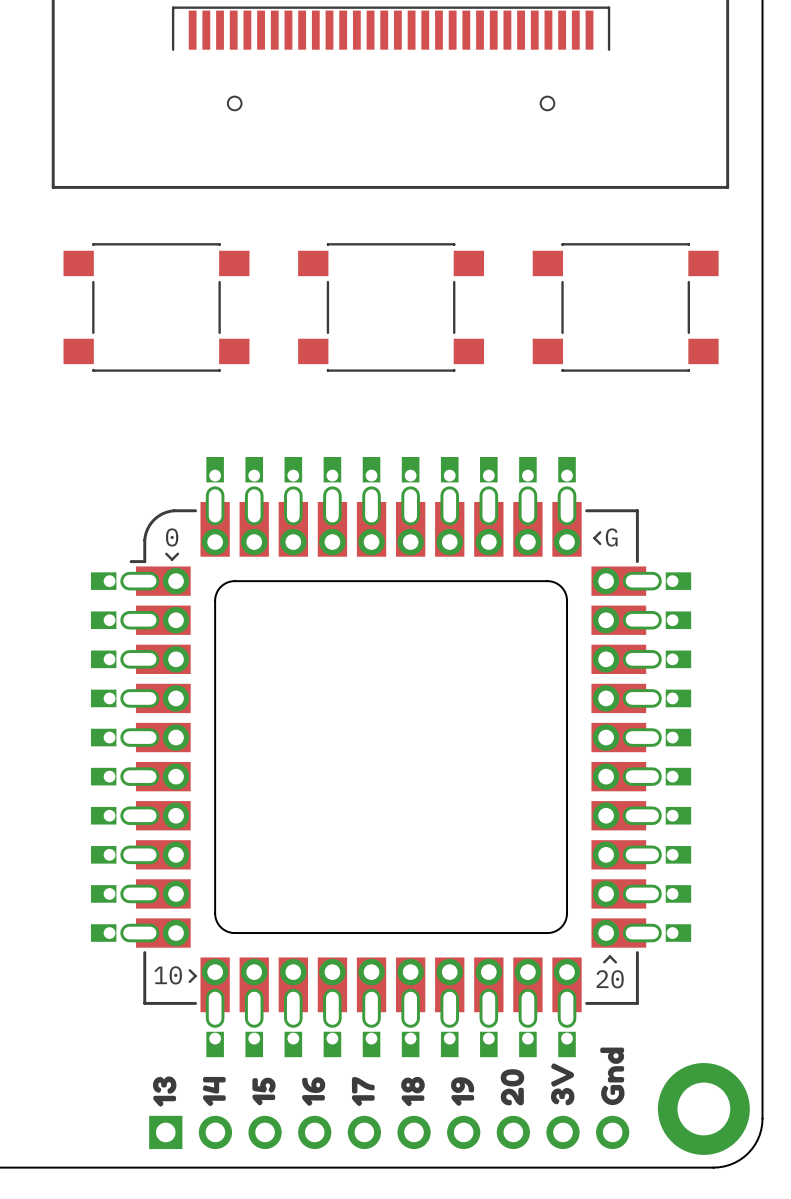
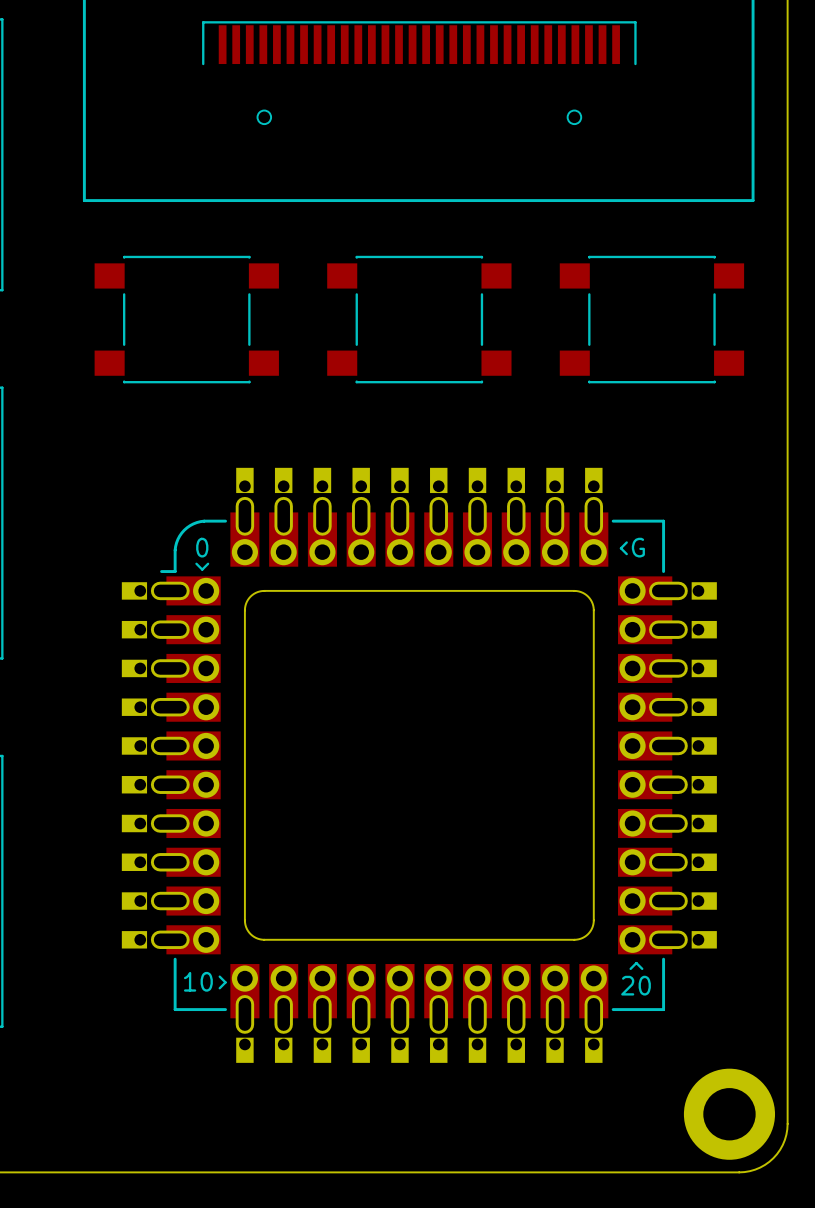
drawing: [600, 1047, 625, 1106] -> none
drawing: [550, 1063, 575, 1106] -> none
drawing: [500, 1069, 525, 1106] -> none
drawing: [152, 1076, 177, 1107] -> none
drawing: [202, 1076, 226, 1107] -> none
drawing: [401, 1076, 425, 1107] -> none
drawing: [252, 1077, 276, 1106] -> none
drawing: [302, 1077, 326, 1106] -> none
drawing: [351, 1077, 375, 1107] -> none
drawing: [451, 1077, 475, 1106] -> none
part: (389, 1132) -> none

